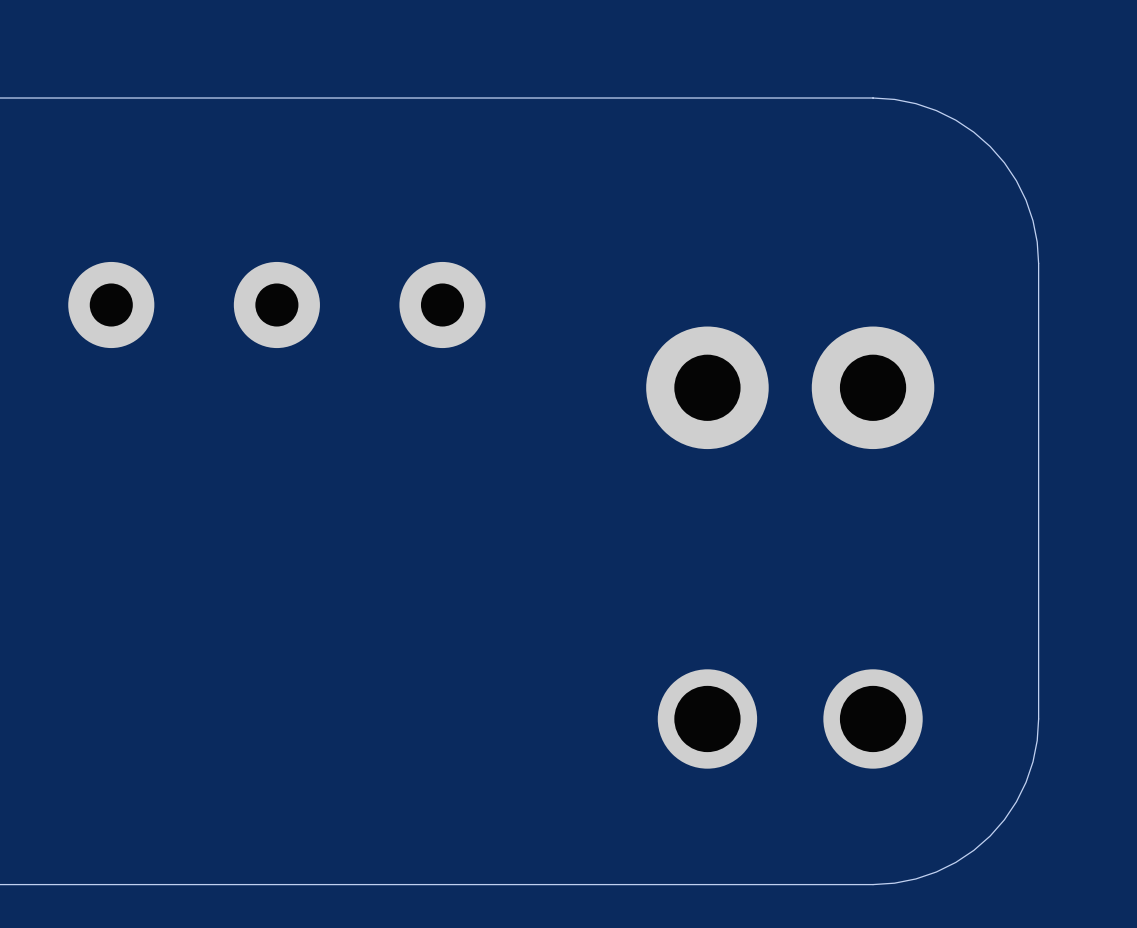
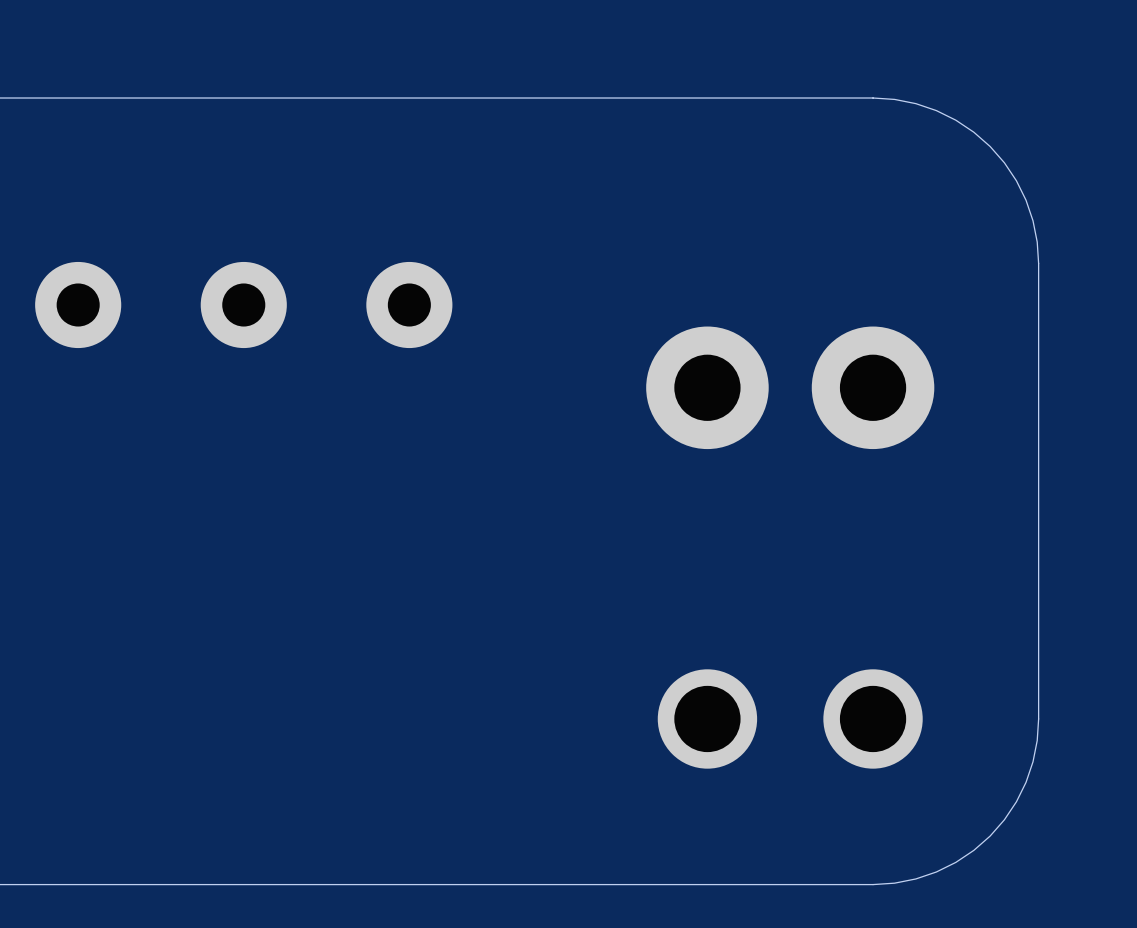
part position: (276, 305) -> (243, 305)

